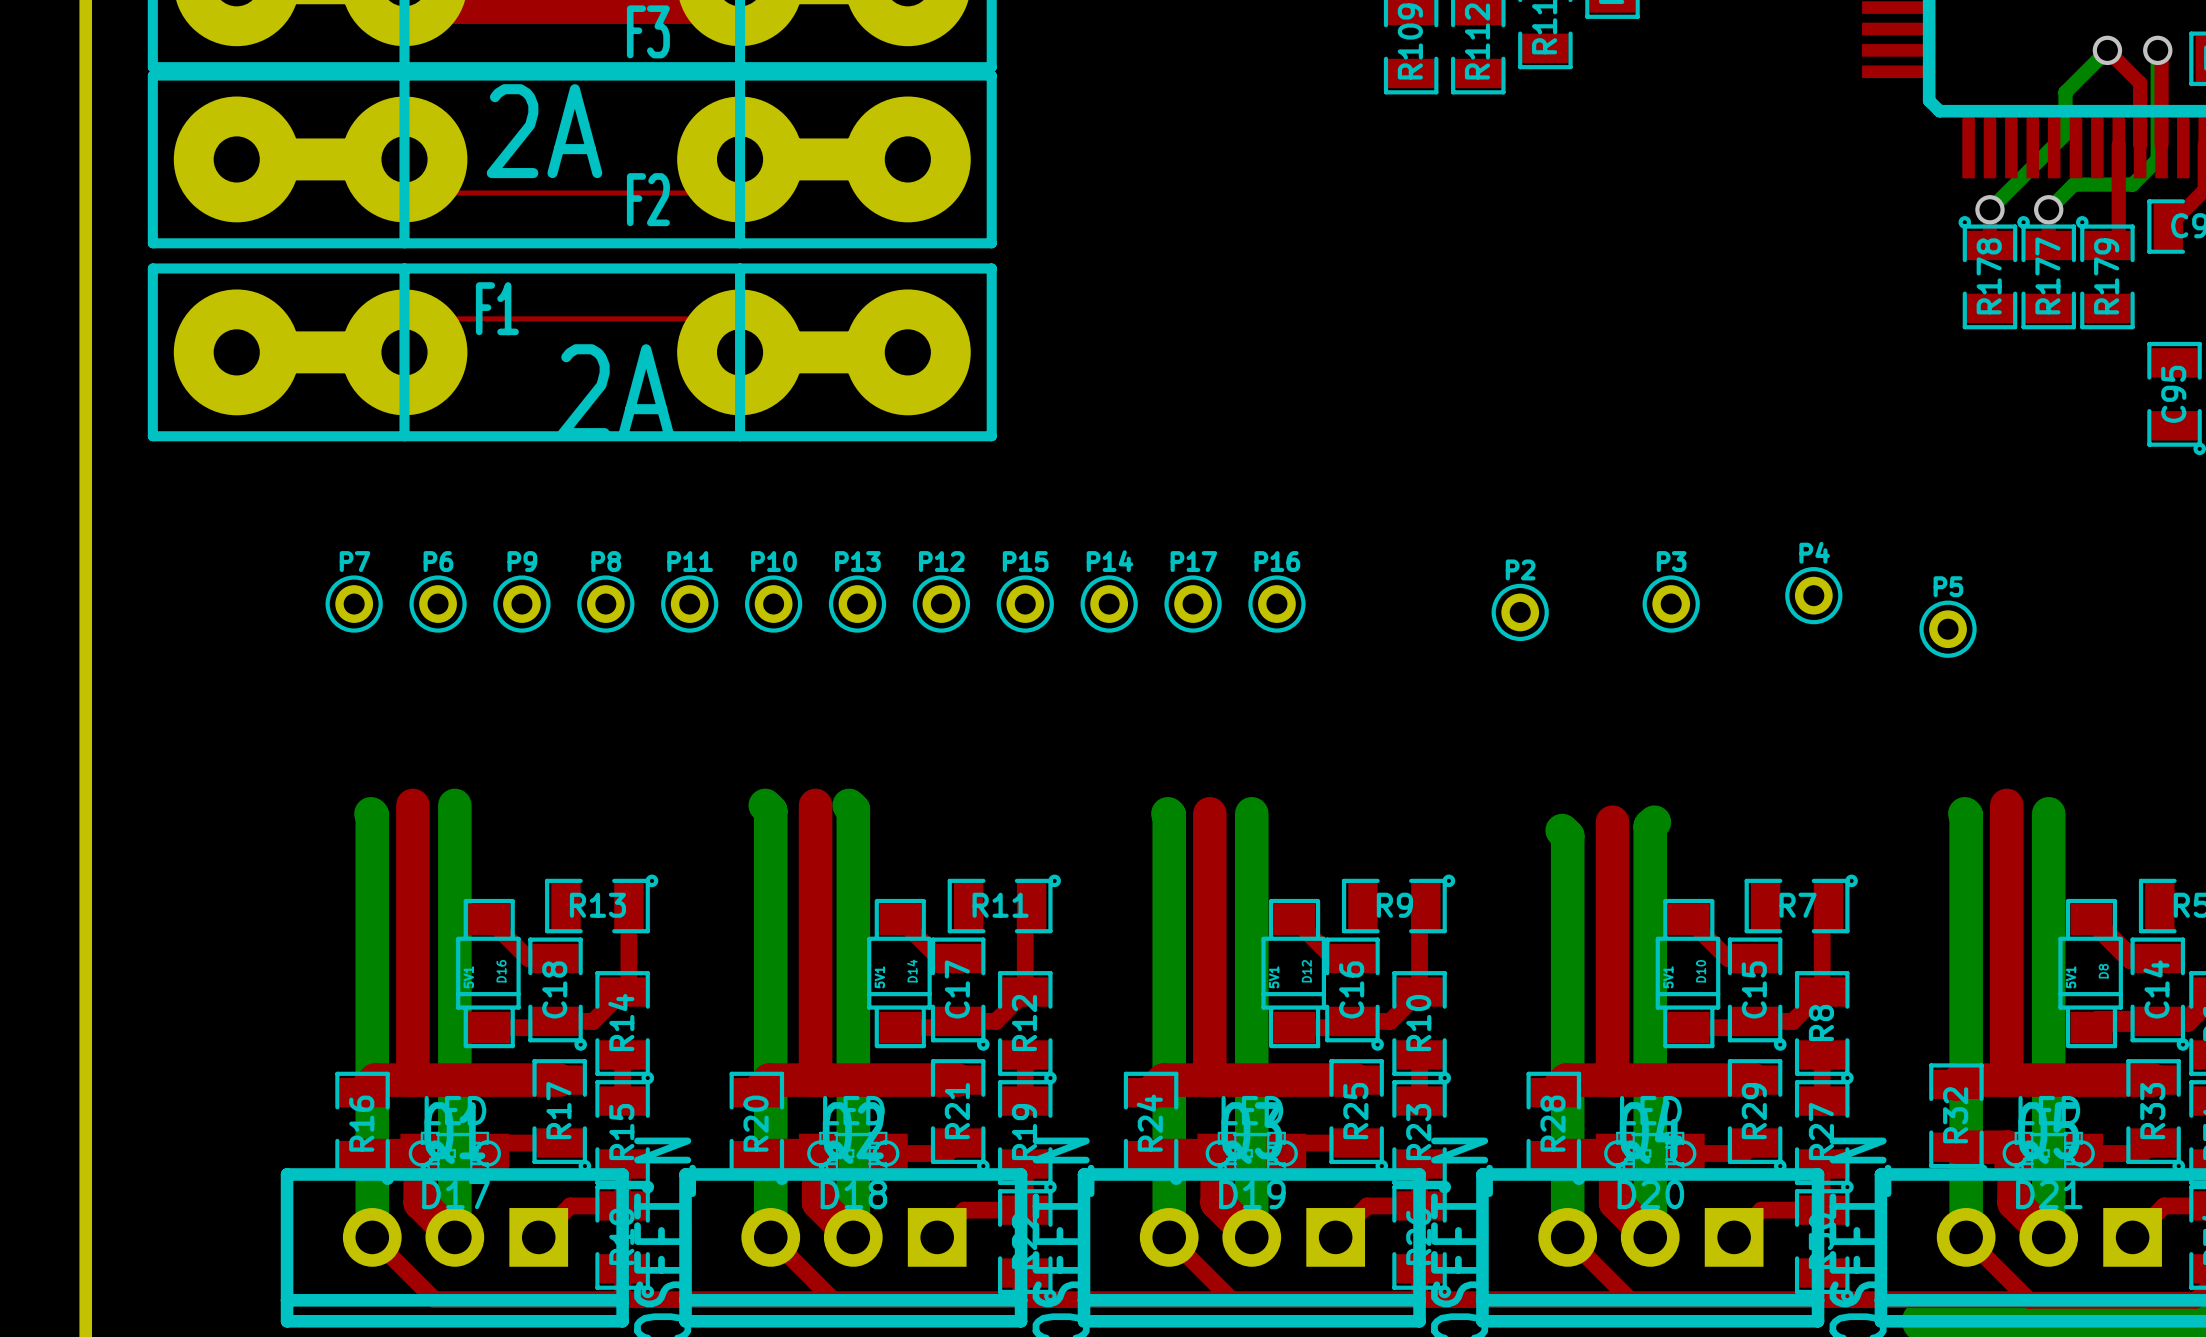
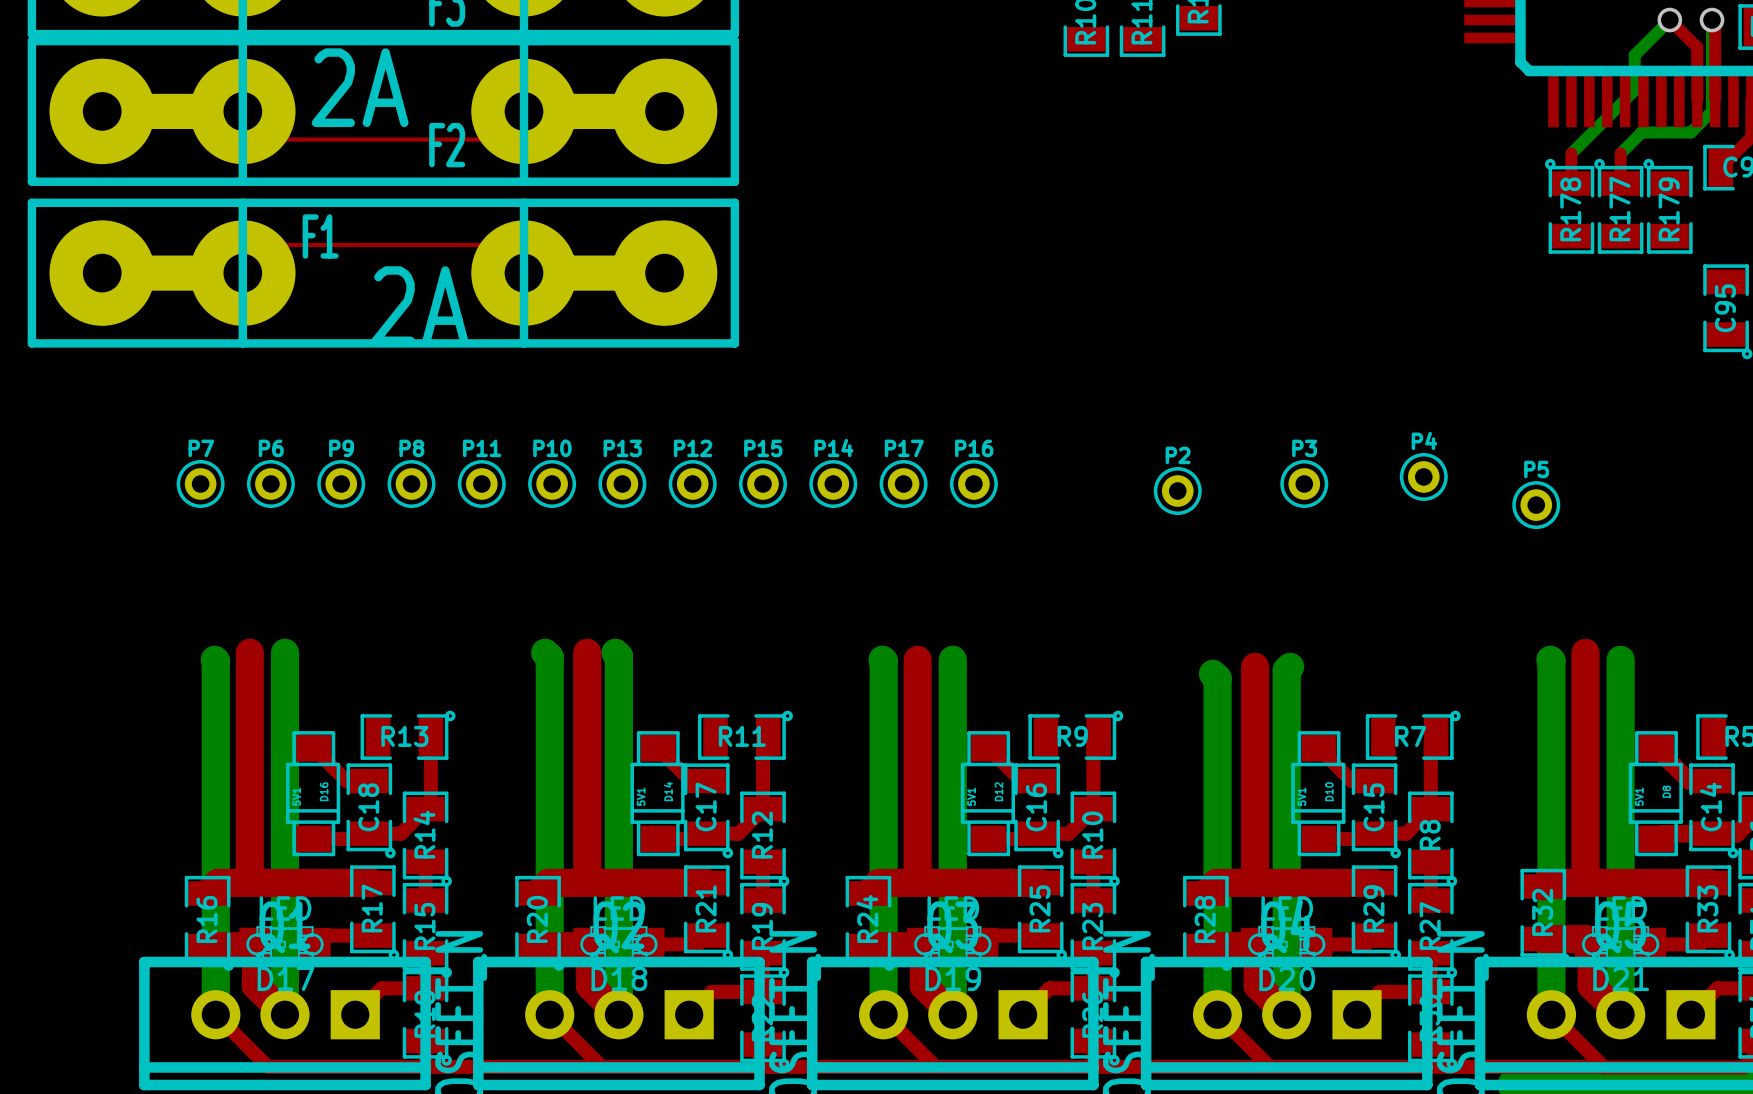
top track: (2118, 144) (2118, 234) (2107, 245) -> none
via: (1989, 209) -> none
via: (2048, 209) -> none

